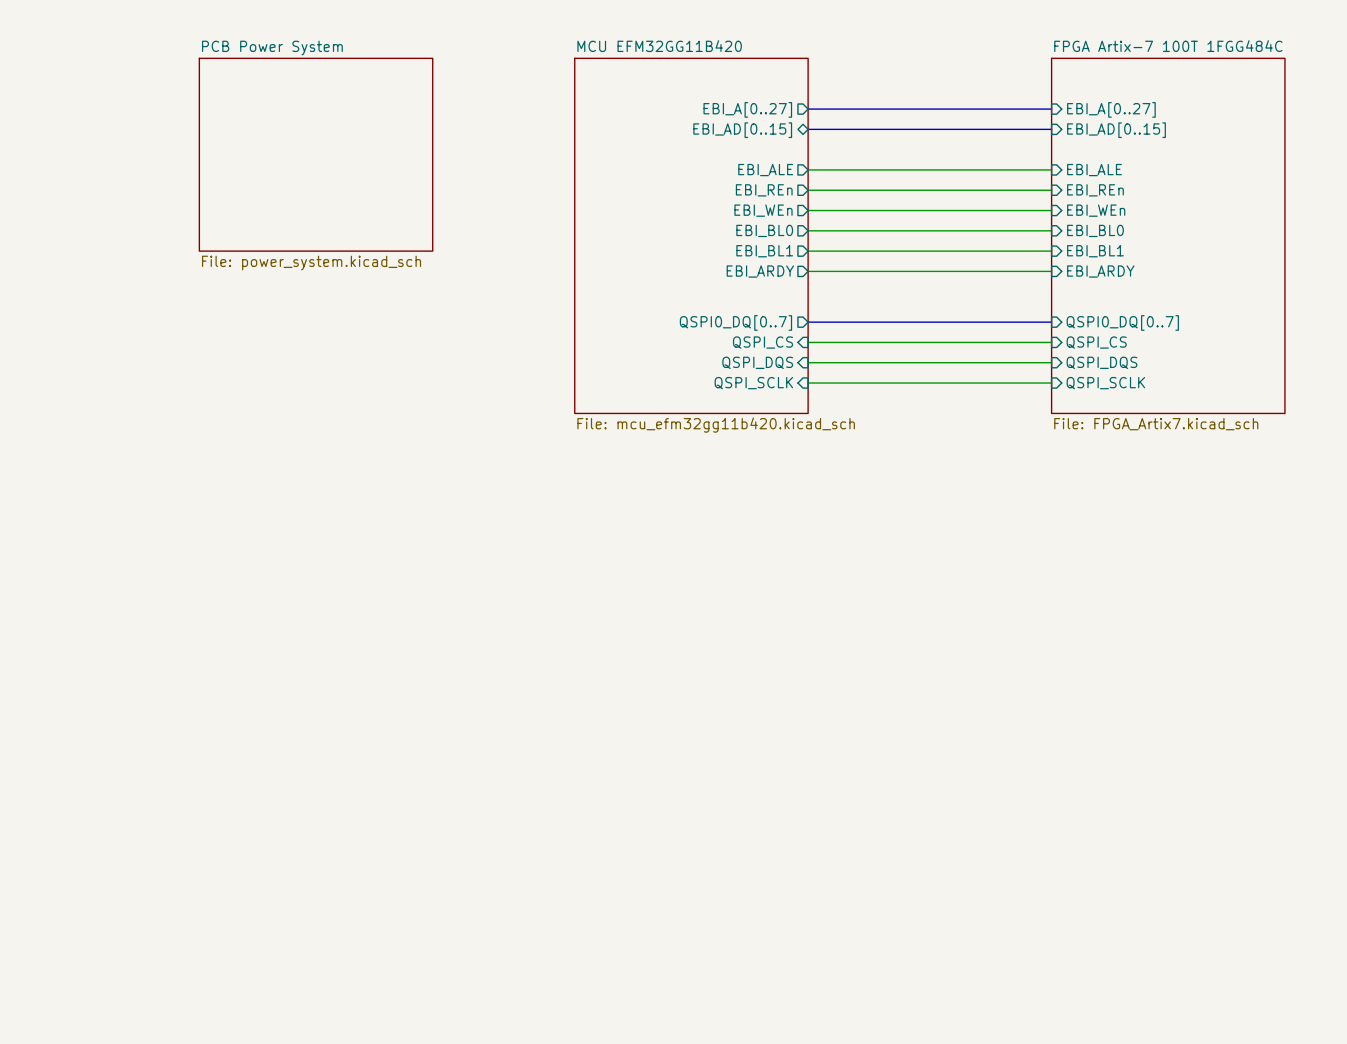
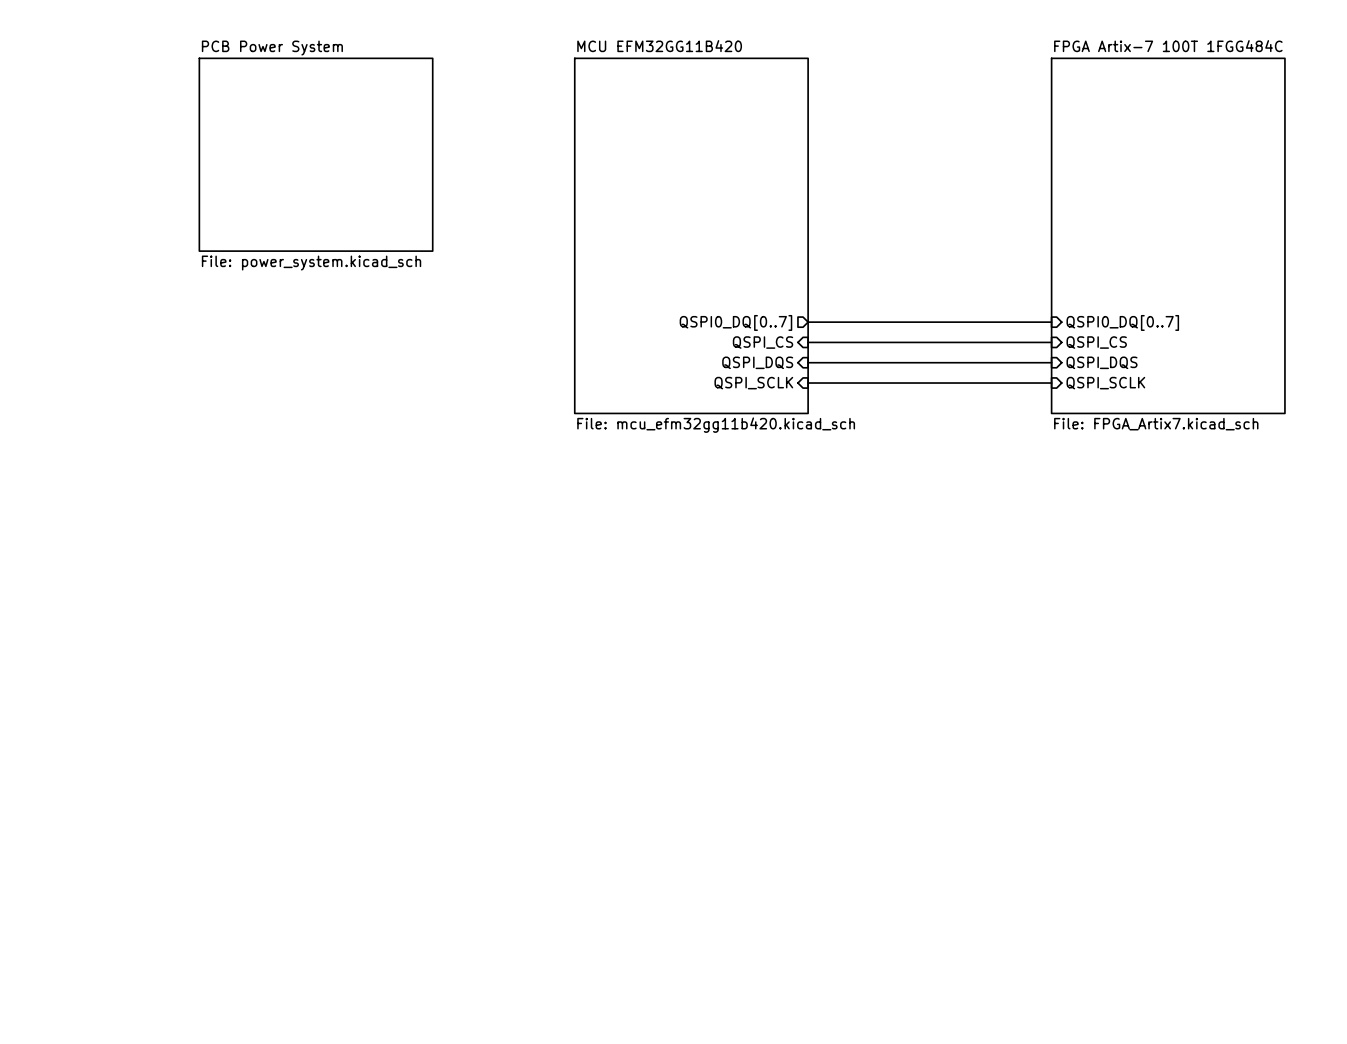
sheet pin: EBI_A[0..27] (747, 109) -> none
bus: (808, 109) (1051, 109) -> none
sheet pin: EBI_A[0..27] (1111, 109) -> none
bus: (808, 129) (1051, 129) -> none
sheet pin: EBI_AD[0..15] (742, 130) -> none
sheet pin: EBI_AD[0..15] (1116, 130) -> none
wire: (808, 169) (1051, 169) -> none
sheet pin: EBI_ALE (765, 170) -> none
sheet pin: EBI_ALE (1094, 170) -> none
sheet pin: EBI_REn (764, 190) -> none
wire: (808, 190) (1051, 190) -> none
sheet pin: EBI_REn (1095, 190) -> none
sheet pin: EBI_WEn (763, 210) -> none
wire: (808, 210) (1051, 210) -> none
sheet pin: EBI_WEn (1096, 210) -> none
sheet pin: EBI_BL0 (764, 230) -> none
wire: (808, 230) (1051, 230) -> none
sheet pin: EBI_BL0 (1095, 230) -> none
sheet pin: EBI_BL1 (764, 251) -> none
wire: (808, 251) (1051, 251) -> none
sheet pin: EBI_BL1 (1095, 251) -> none
sheet pin: EBI_ARDY (760, 271) -> none
wire: (808, 271) (1051, 271) -> none
sheet pin: EBI_ARDY (1100, 271) -> none

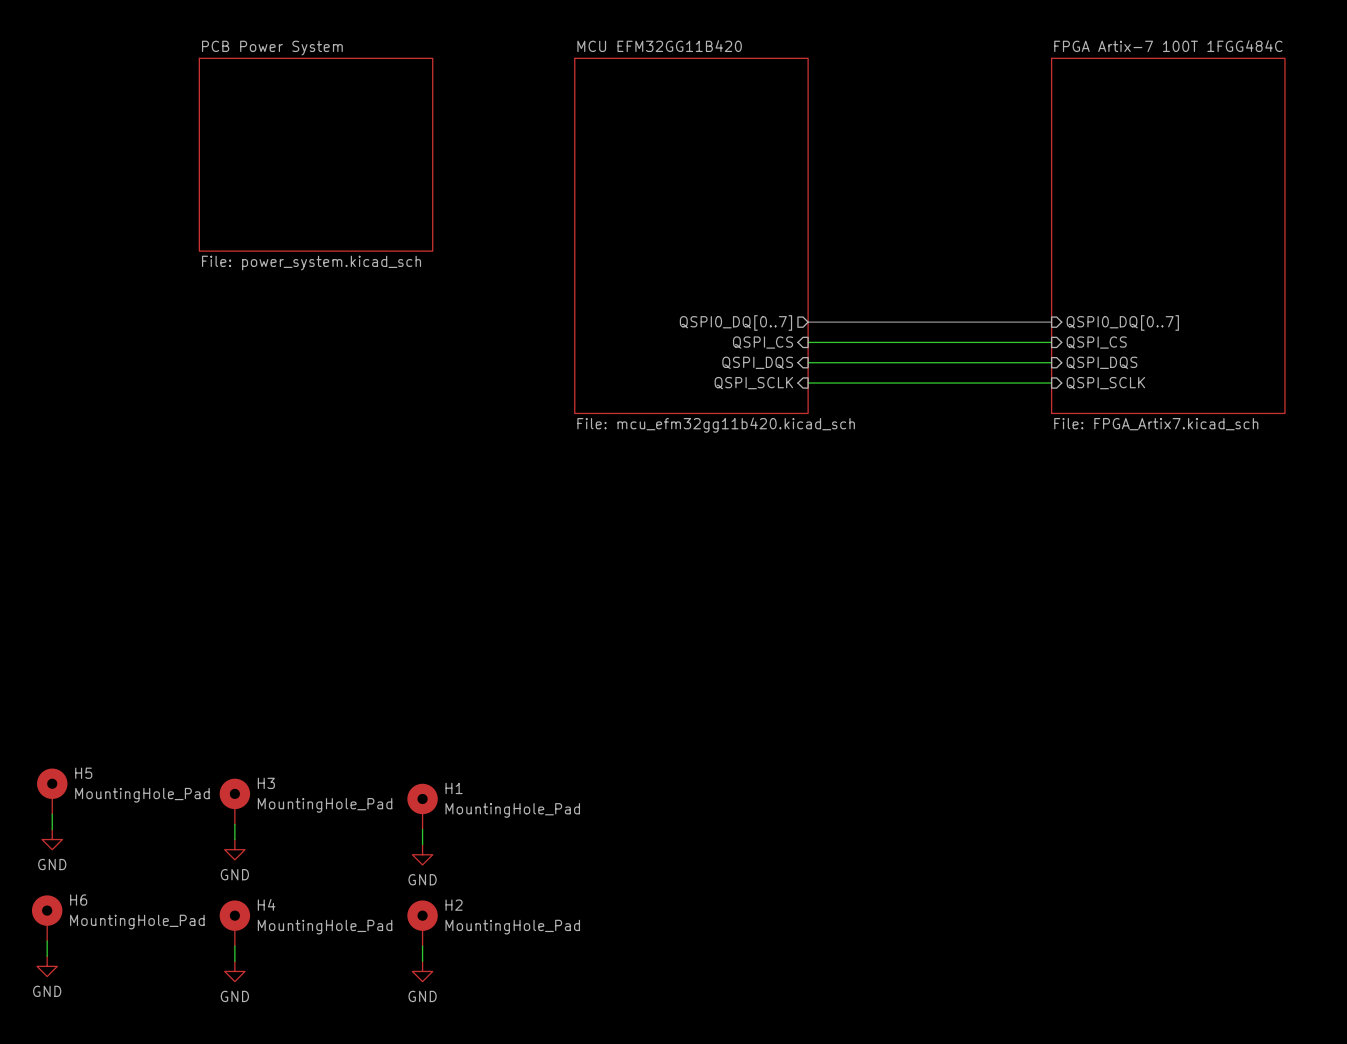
H5: none -> MountingHole_Pad (52, 791)
H3: none -> MountingHole_Pad (234, 801)
H1: none -> MountingHole_Pad (422, 806)
wire: none -> (52, 814) (52, 829)
wire: none -> (234, 824) (234, 839)
wire: none -> (422, 829) (422, 844)
power symbol: none -> GND (52, 839)
power symbol: none -> GND (234, 849)
power symbol: none -> GND (422, 854)
H6: none -> MountingHole_Pad (47, 918)
H4: none -> MountingHole_Pad (234, 923)
H2: none -> MountingHole_Pad (422, 923)
wire: none -> (47, 941) (47, 956)
wire: none -> (234, 946) (234, 961)
wire: none -> (422, 946) (422, 961)
power symbol: none -> GND (47, 966)
power symbol: none -> GND (234, 971)
power symbol: none -> GND (422, 971)

